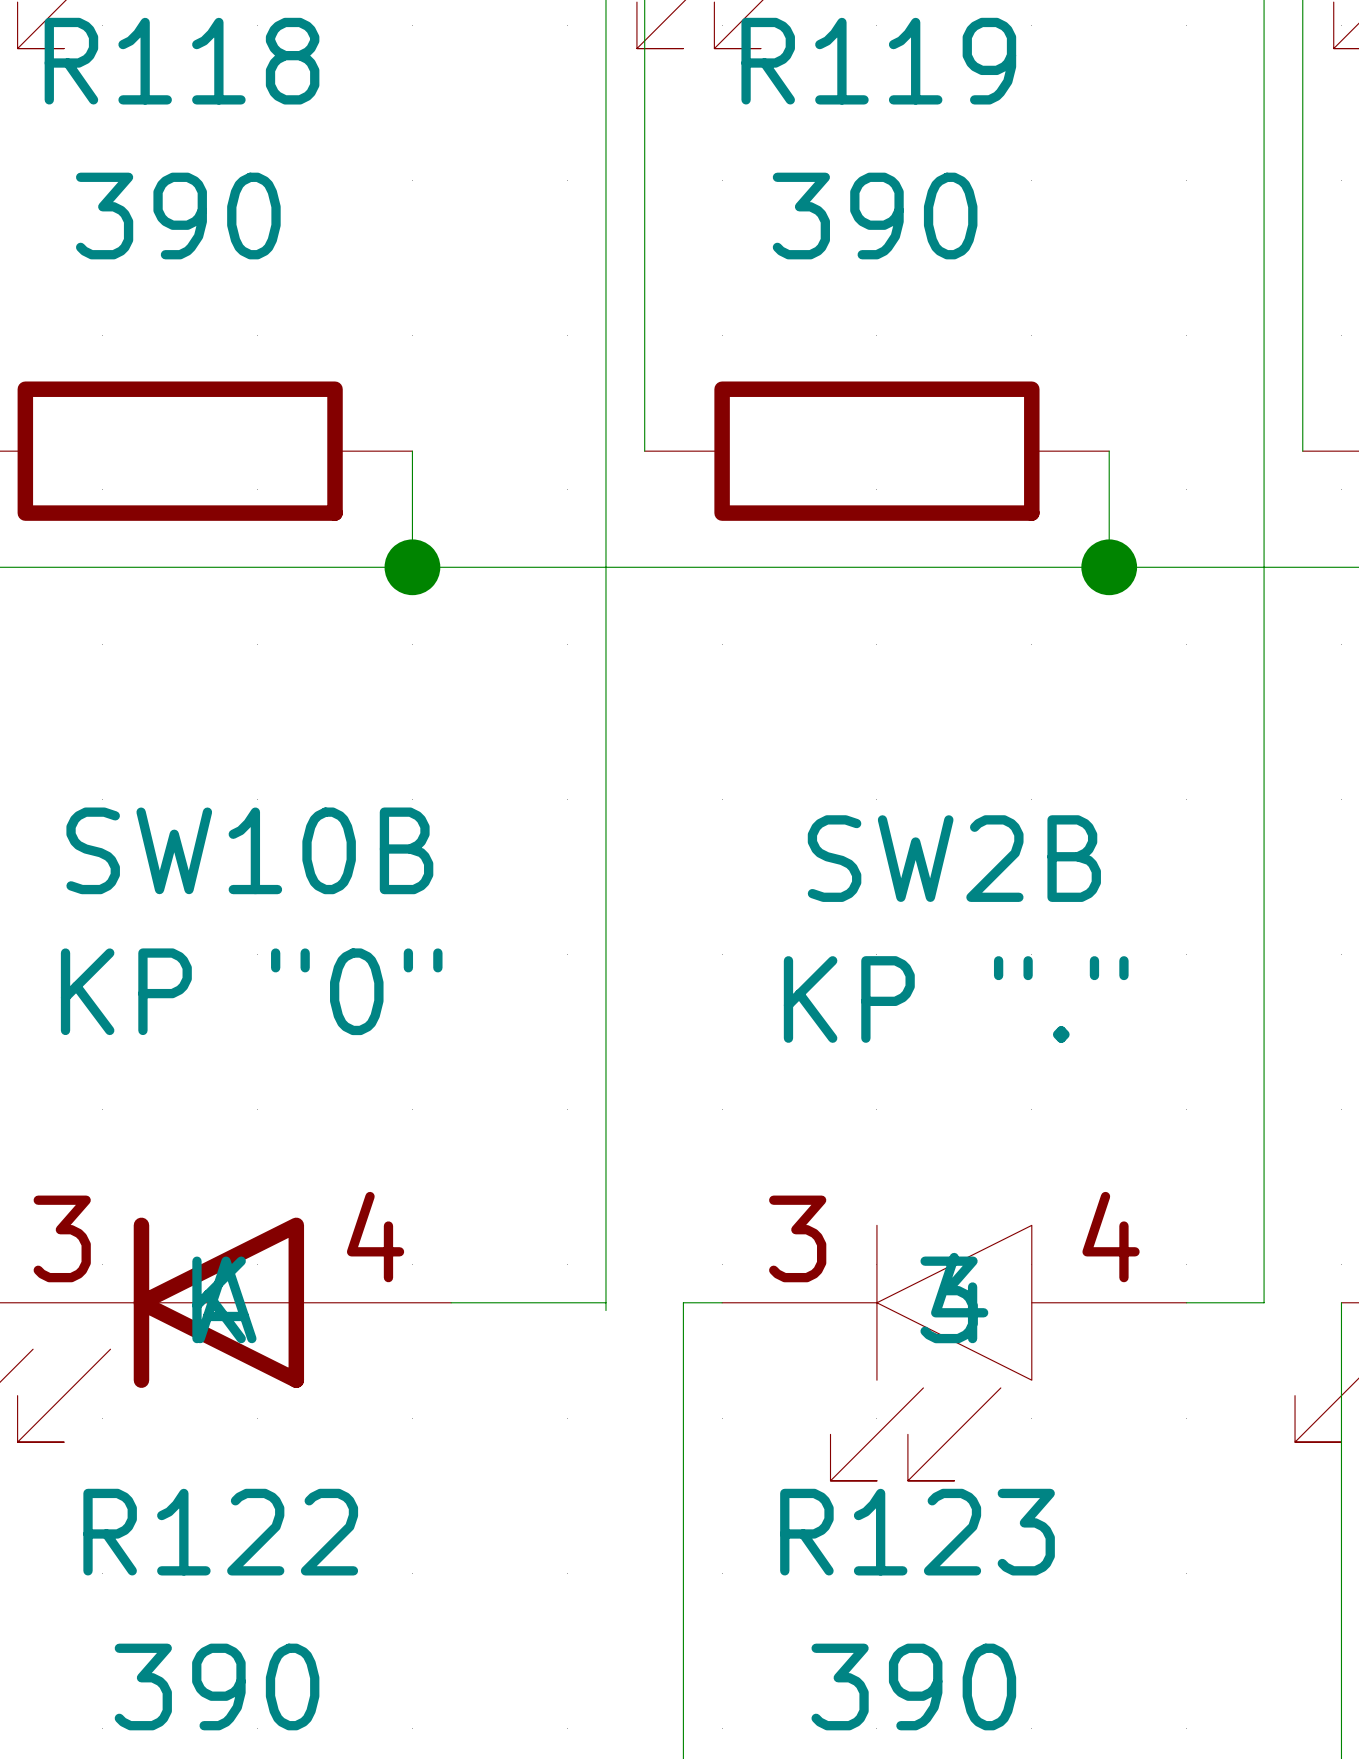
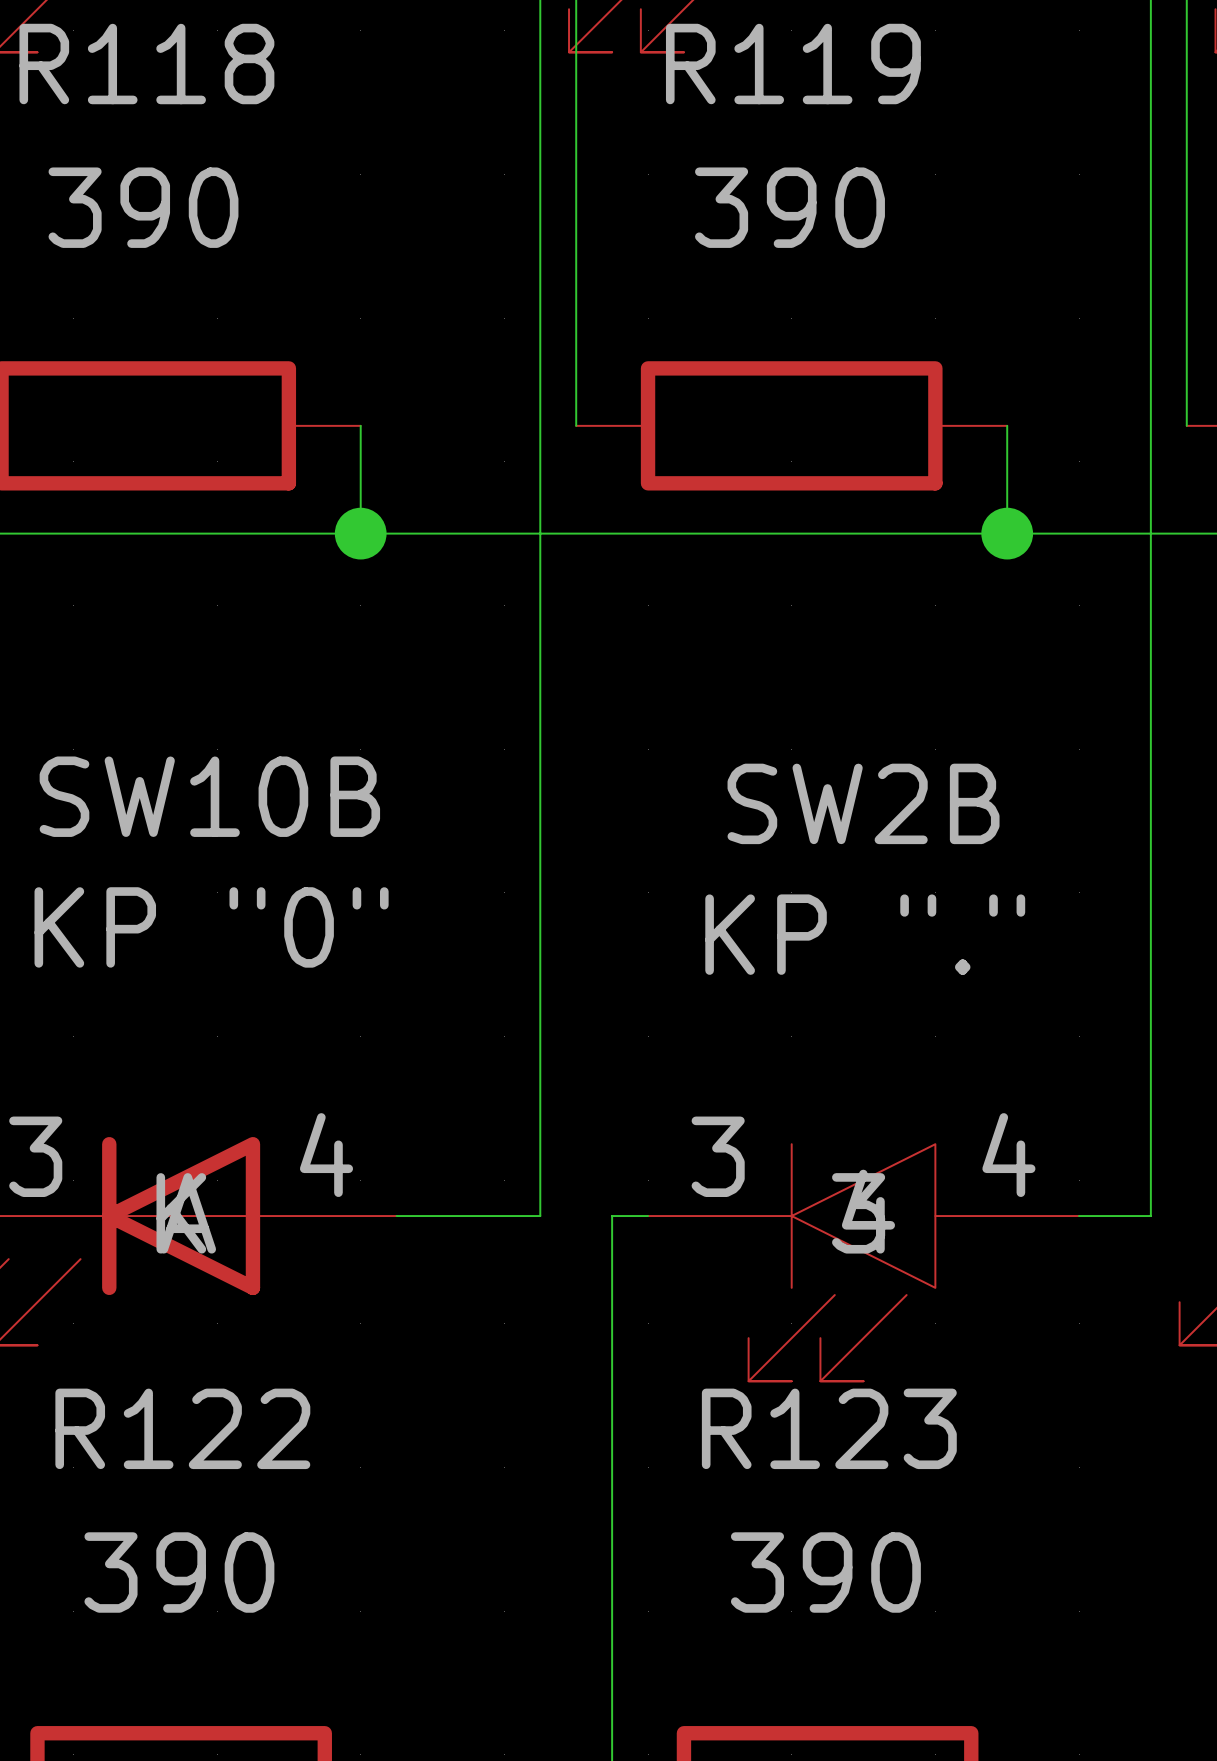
wire: (605, 1302) (605, 1310) -> none

